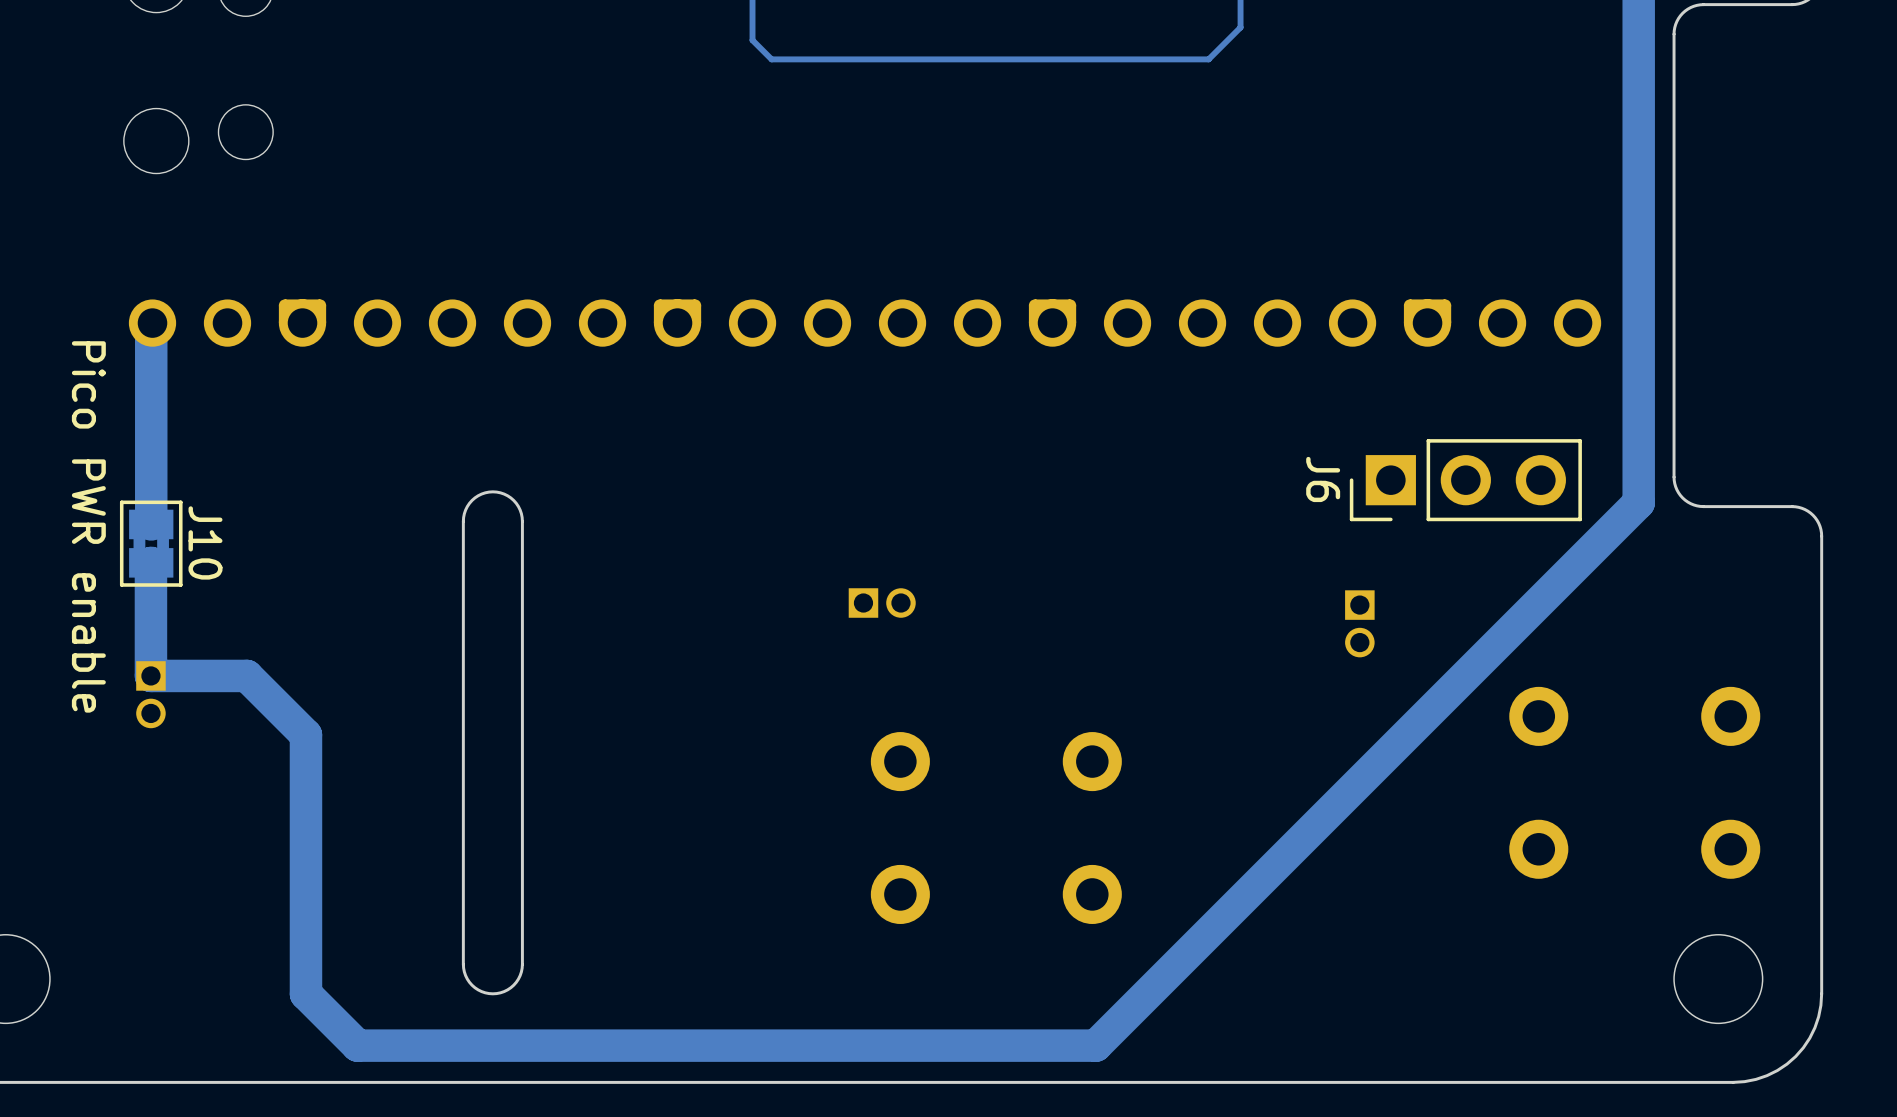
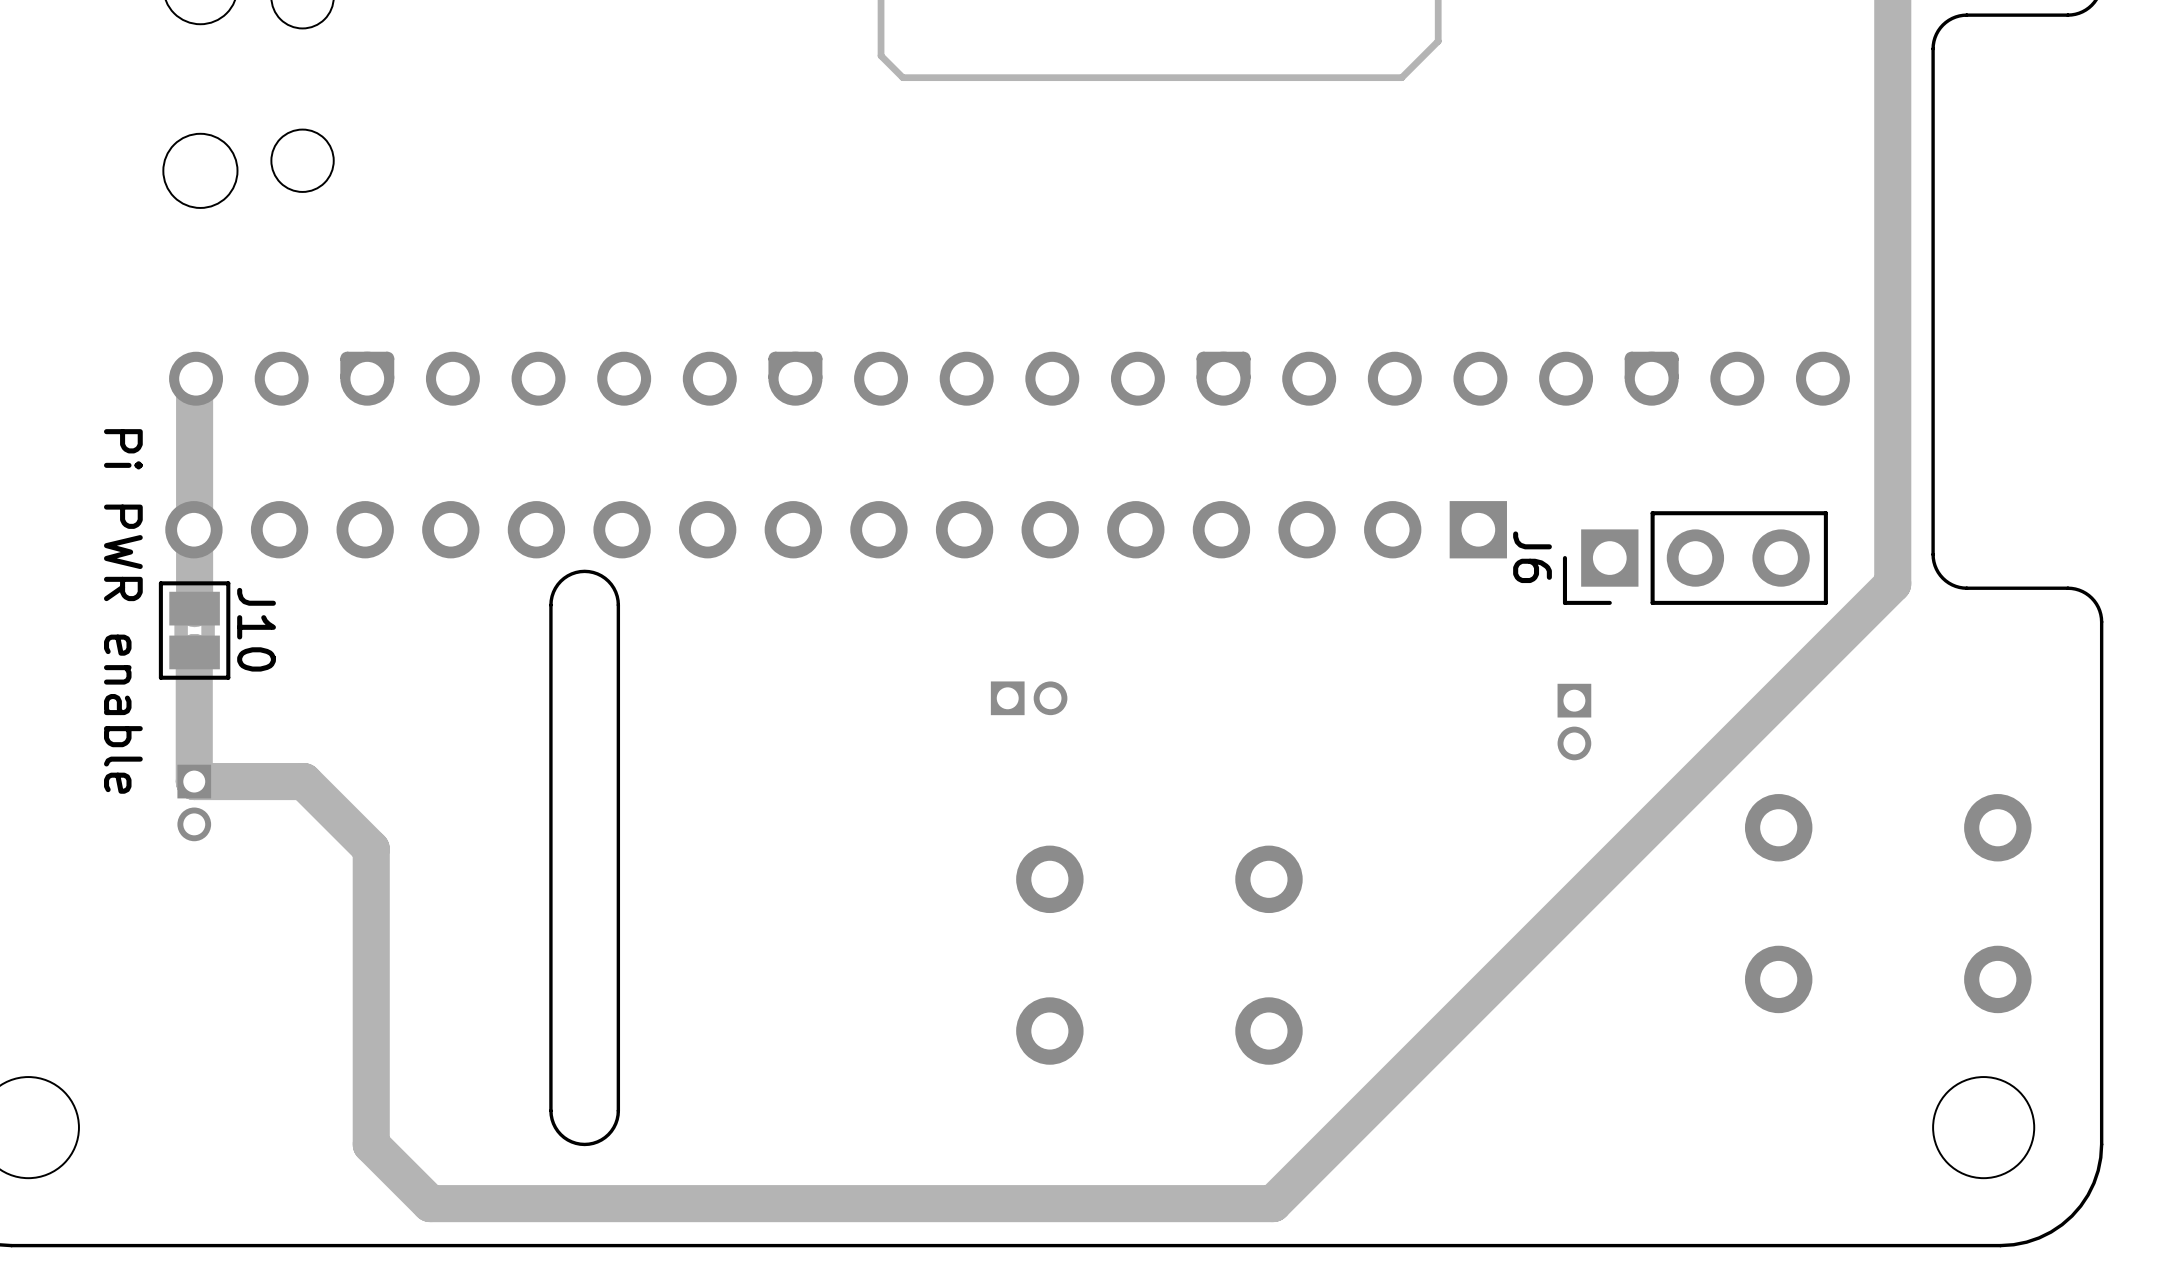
part: none -> (836, 529)
J10 value: Pico PWR enable (88, 526) -> Pi PWR enable (123, 611)

